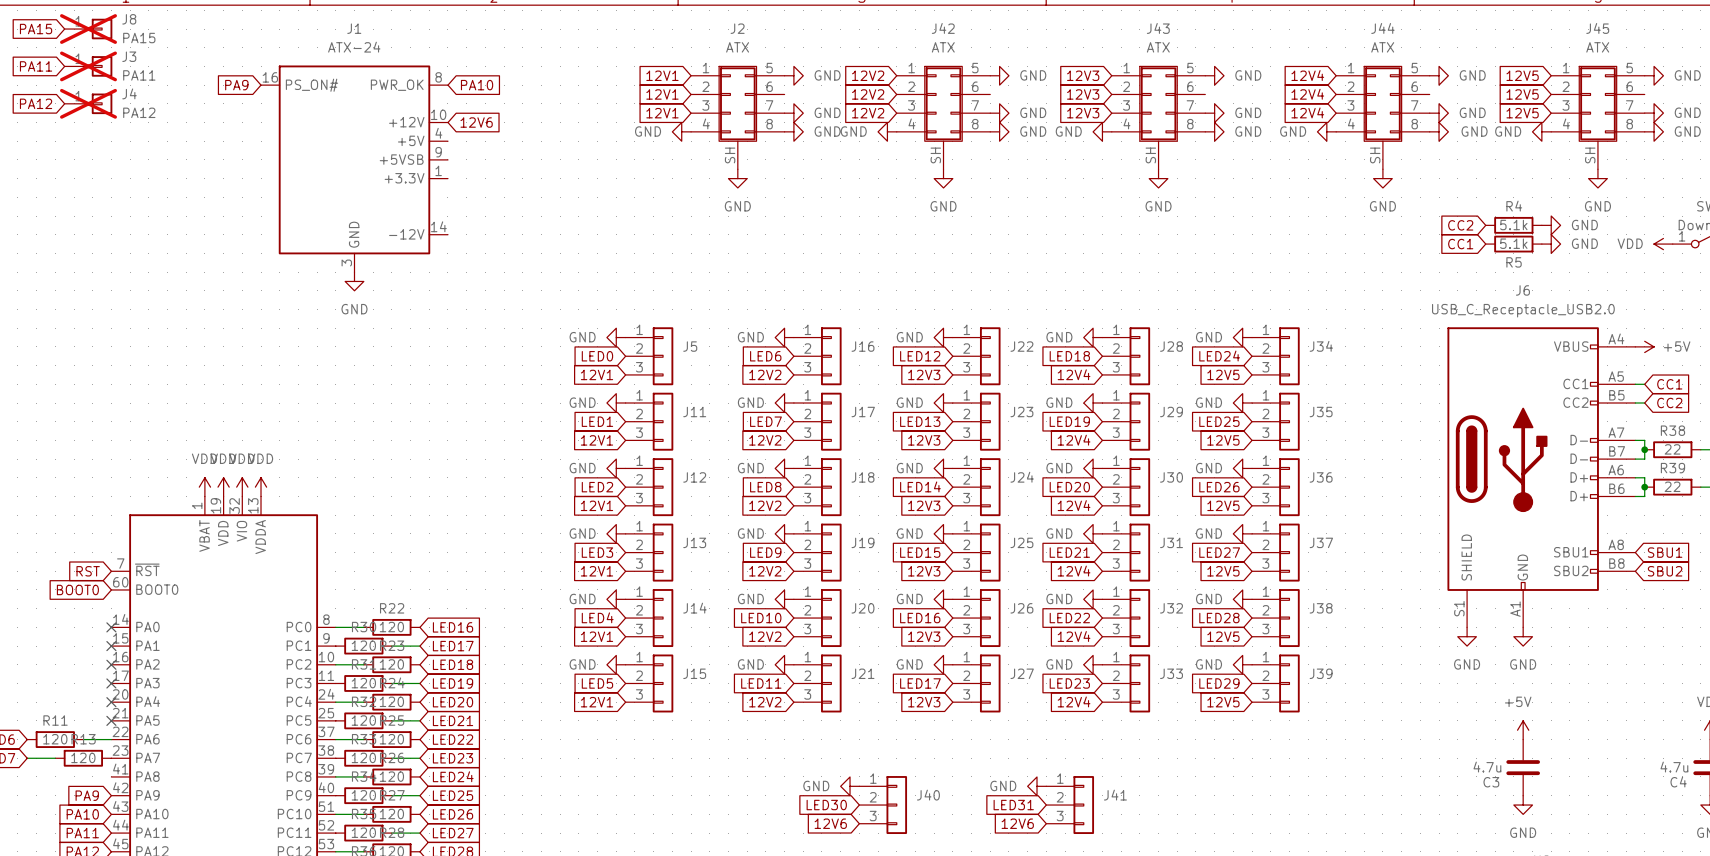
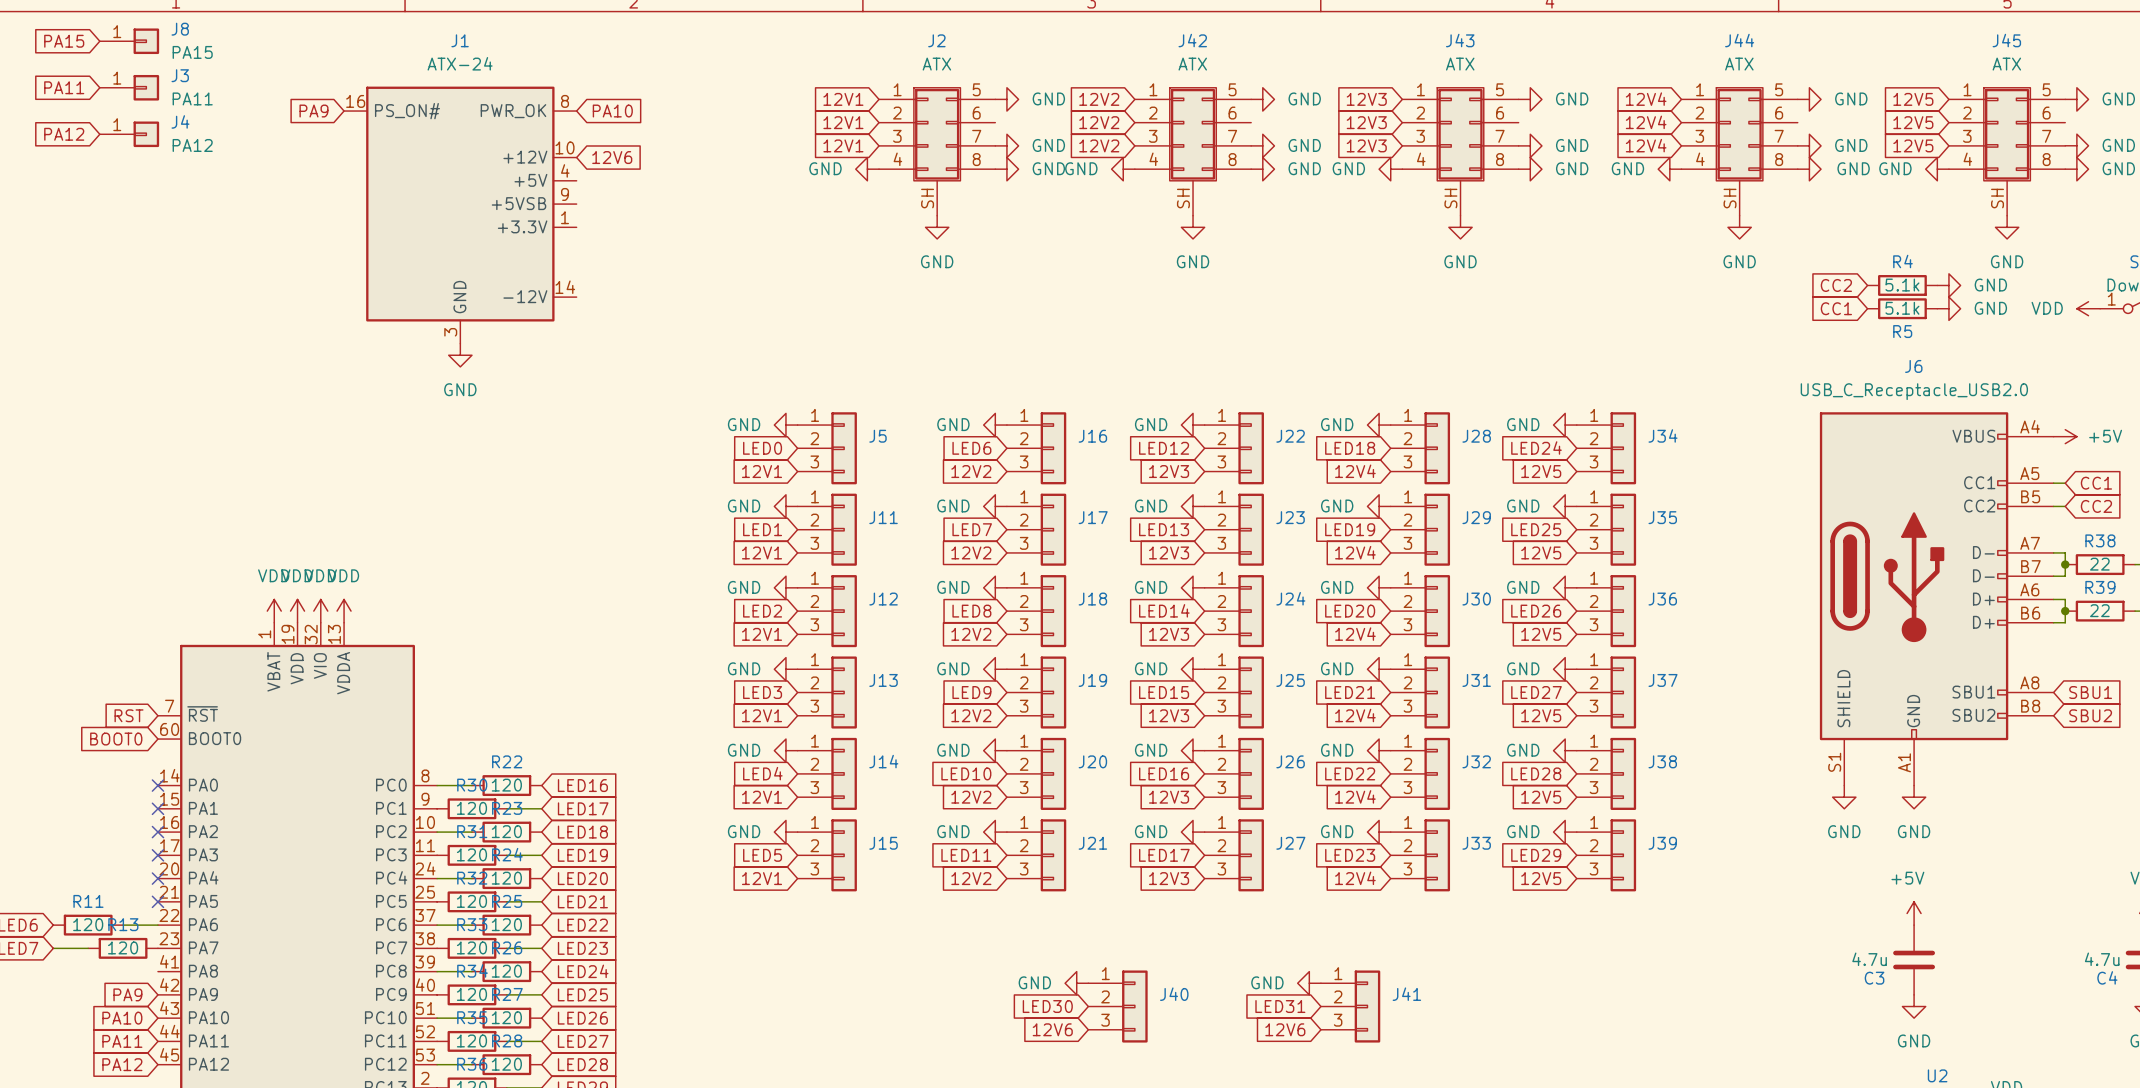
J8 do-not-place cross: (88, 29) -> none
J3 do-not-place cross: (88, 66) -> none
J4 do-not-place cross: (88, 103) -> none

